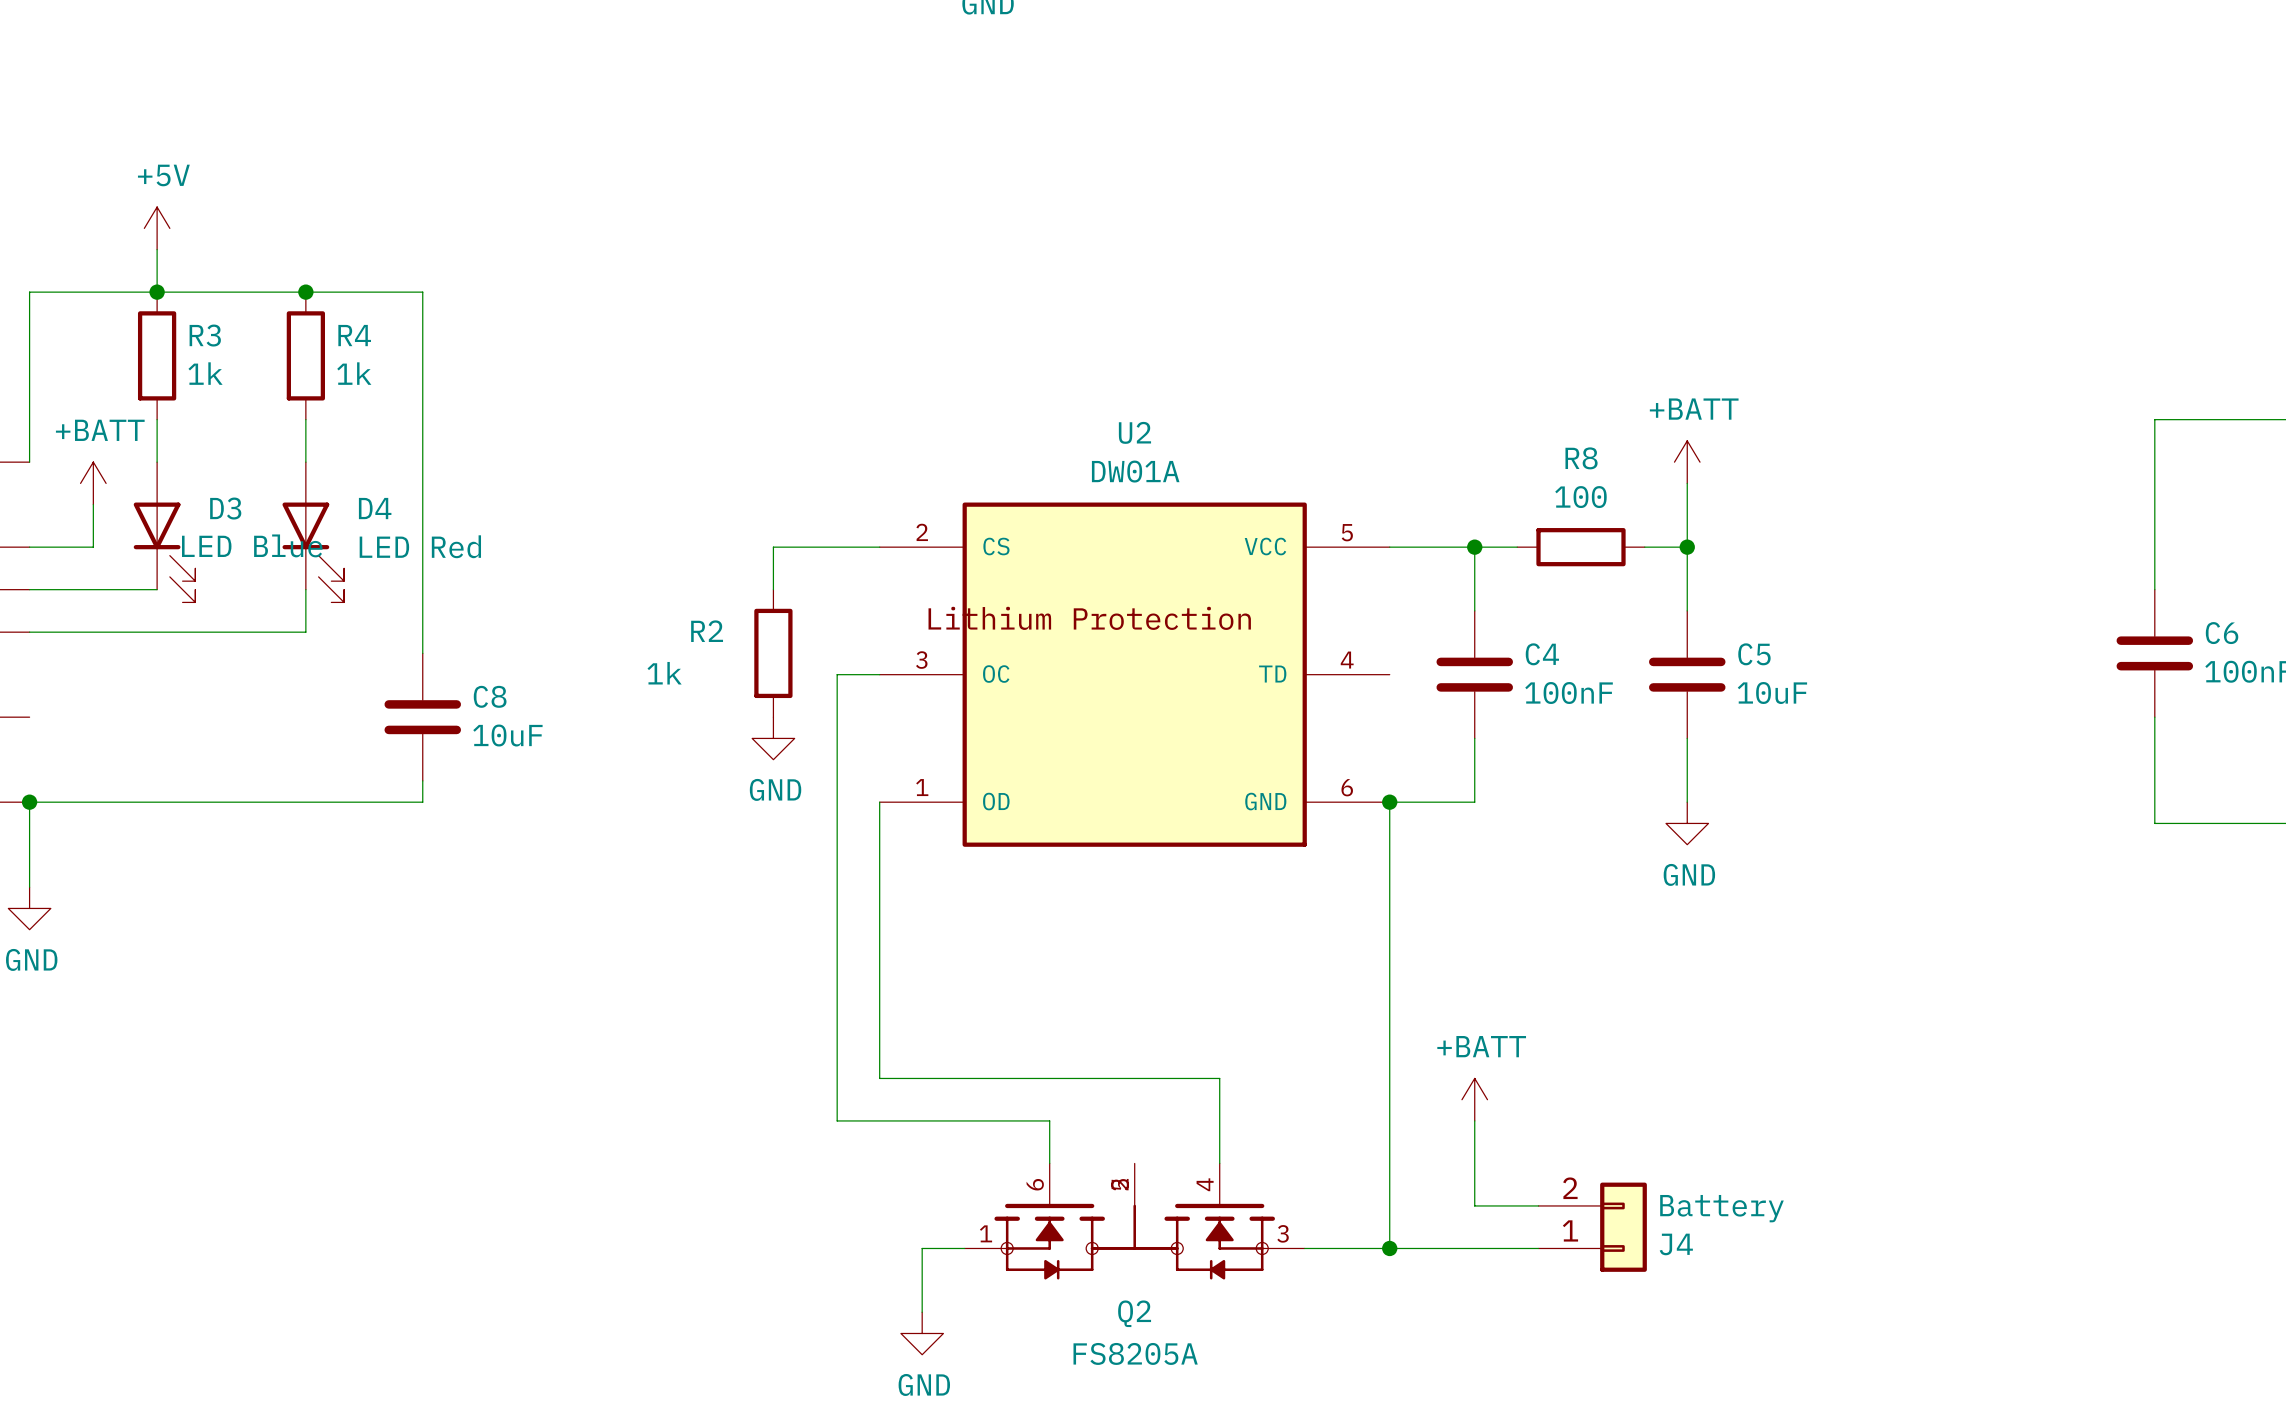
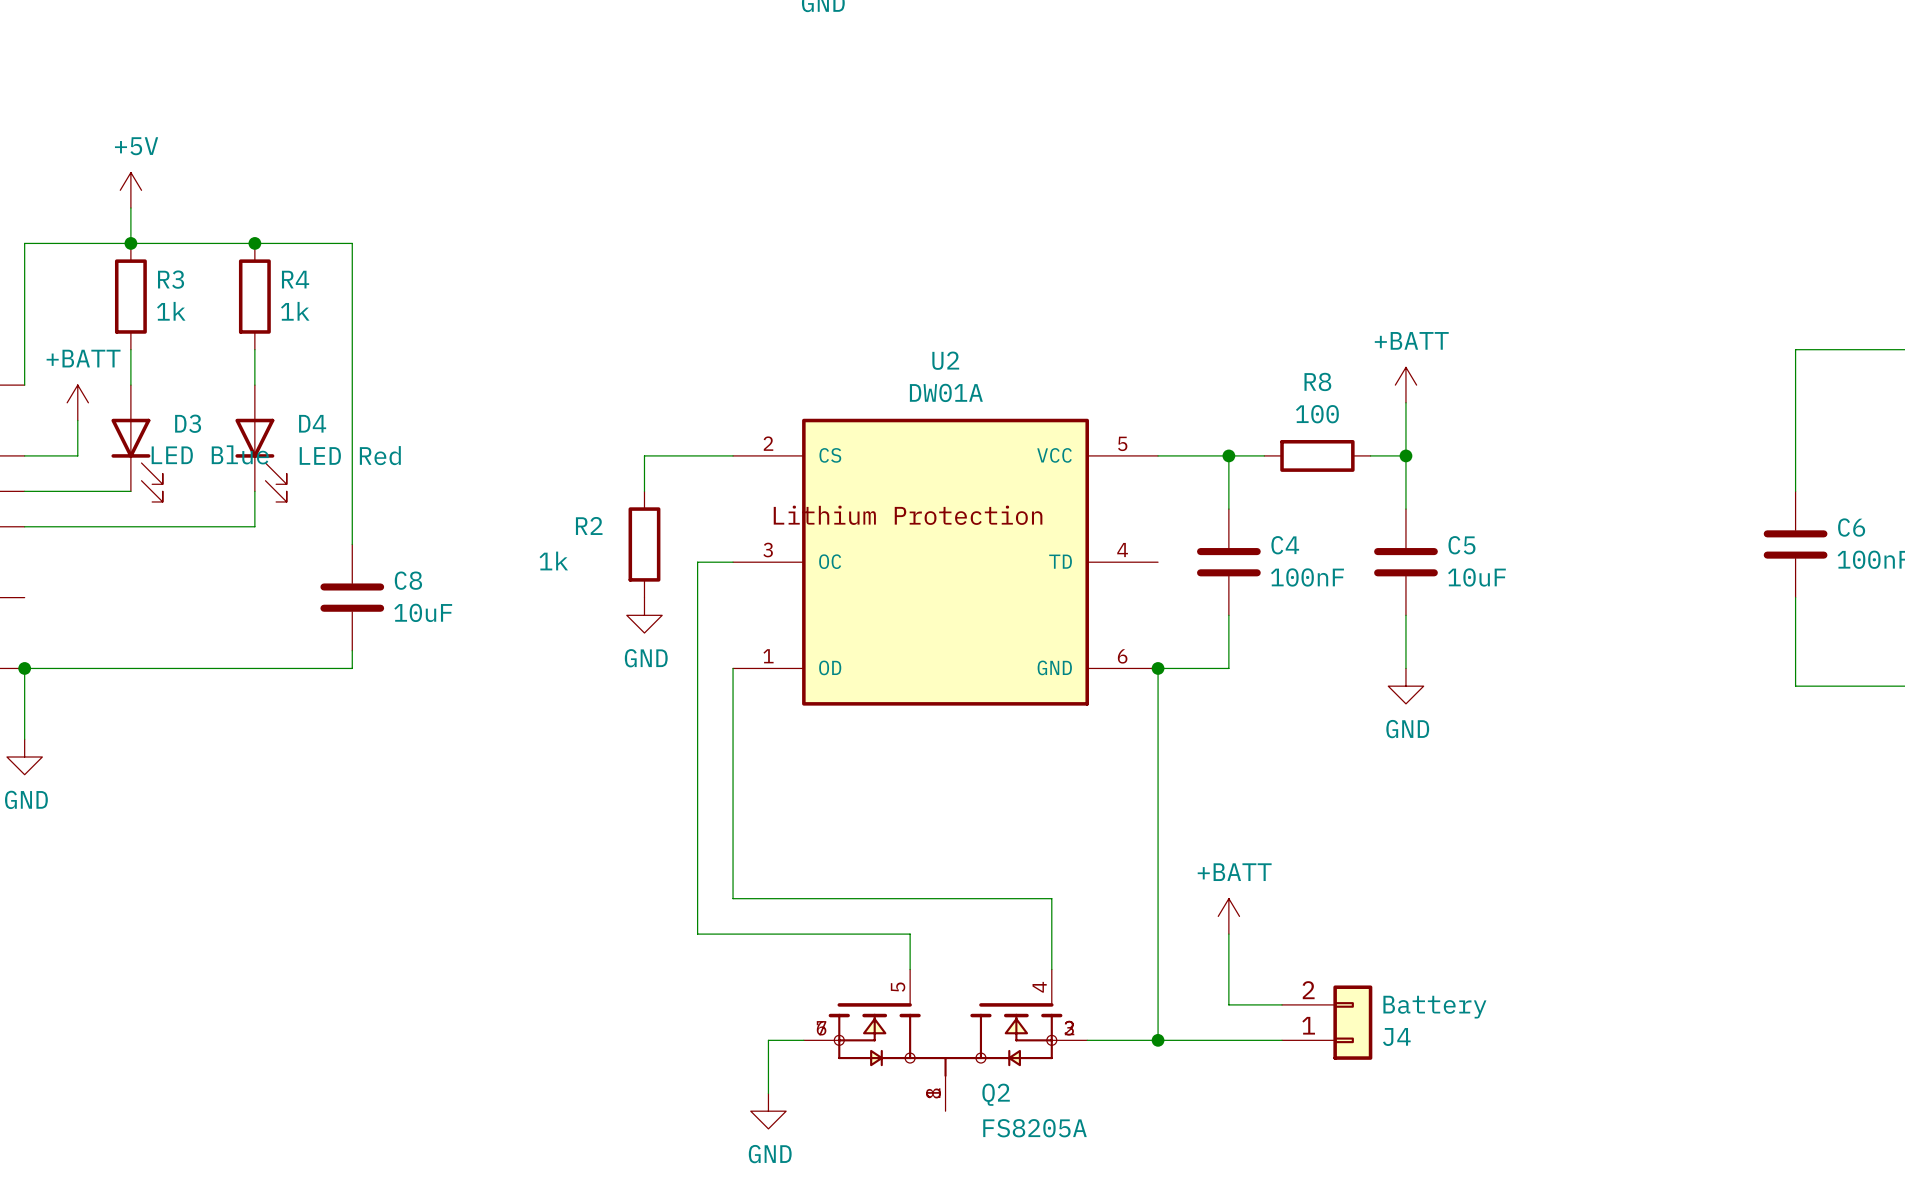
wire: (1219, 1078) (1219, 1163) -> (1016, 898) (1051, 898) (1051, 969)
wire: (1049, 1120) (1049, 1163) -> (874, 934) (910, 934) (910, 969)
Q2 symbol: [964, 1163, 1305, 1280] -> [803, 969, 1088, 1112]
Q2 name position: Q2 (1134, 1313) -> Q2 (996, 1094)
Q2 value position: FS8205A (1135, 1353) -> FS8205A (1035, 1128)

